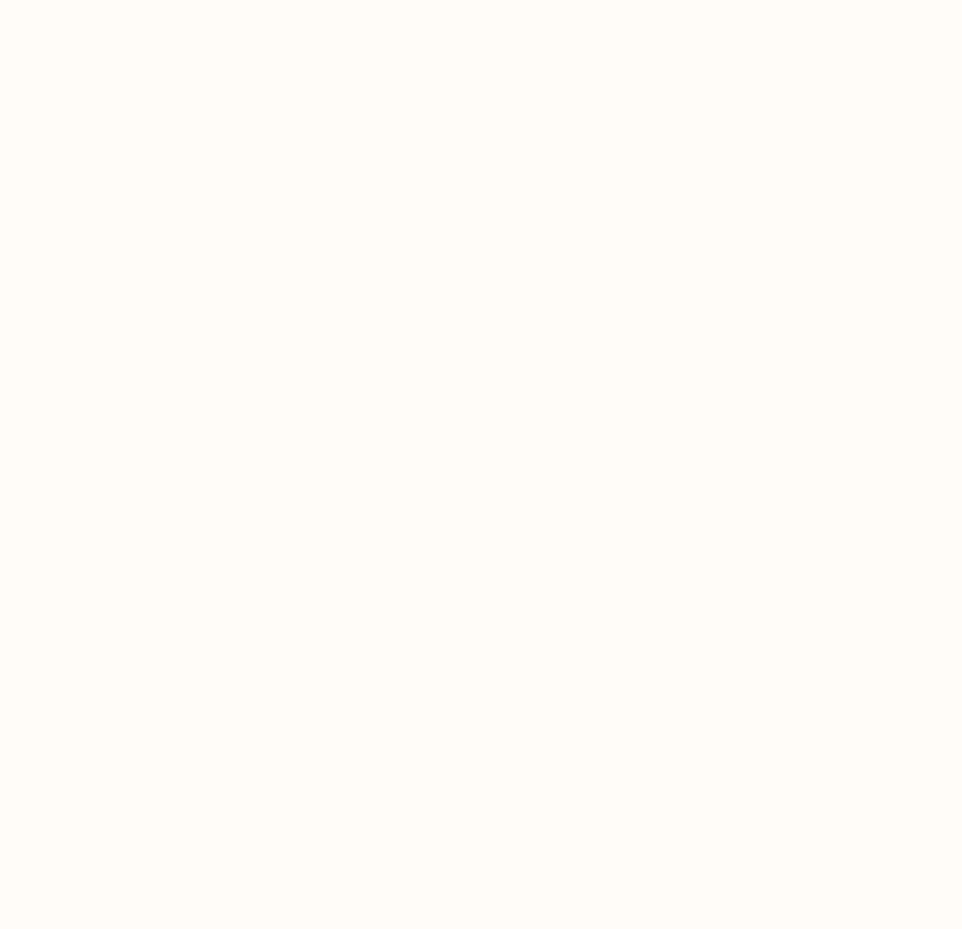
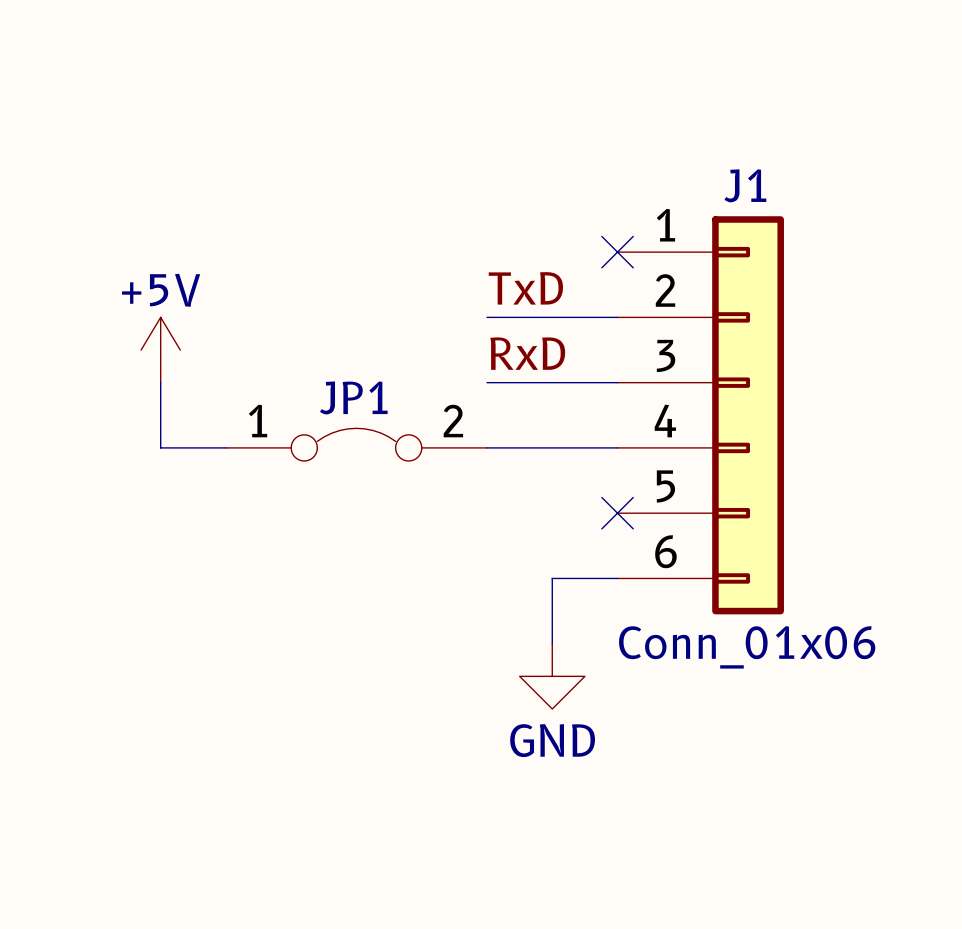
no-connect mark: none -> (617, 252)
label: none -> TxD (525, 288)
wire: none -> (487, 317) (617, 317)
power symbol: none -> +5V (160, 350)
label: none -> RxD (527, 353)
wire: none -> (160, 382) (160, 447) (225, 447)
wire: none -> (487, 382) (617, 382)
J1: none -> Conn_01x06 (700, 415)
JP1: none -> (356, 444)
wire: none -> (487, 447) (617, 447)
no-connect mark: none -> (617, 513)
wire: none -> (617, 578) (552, 578) (552, 643)
power symbol: none -> GND (552, 676)

